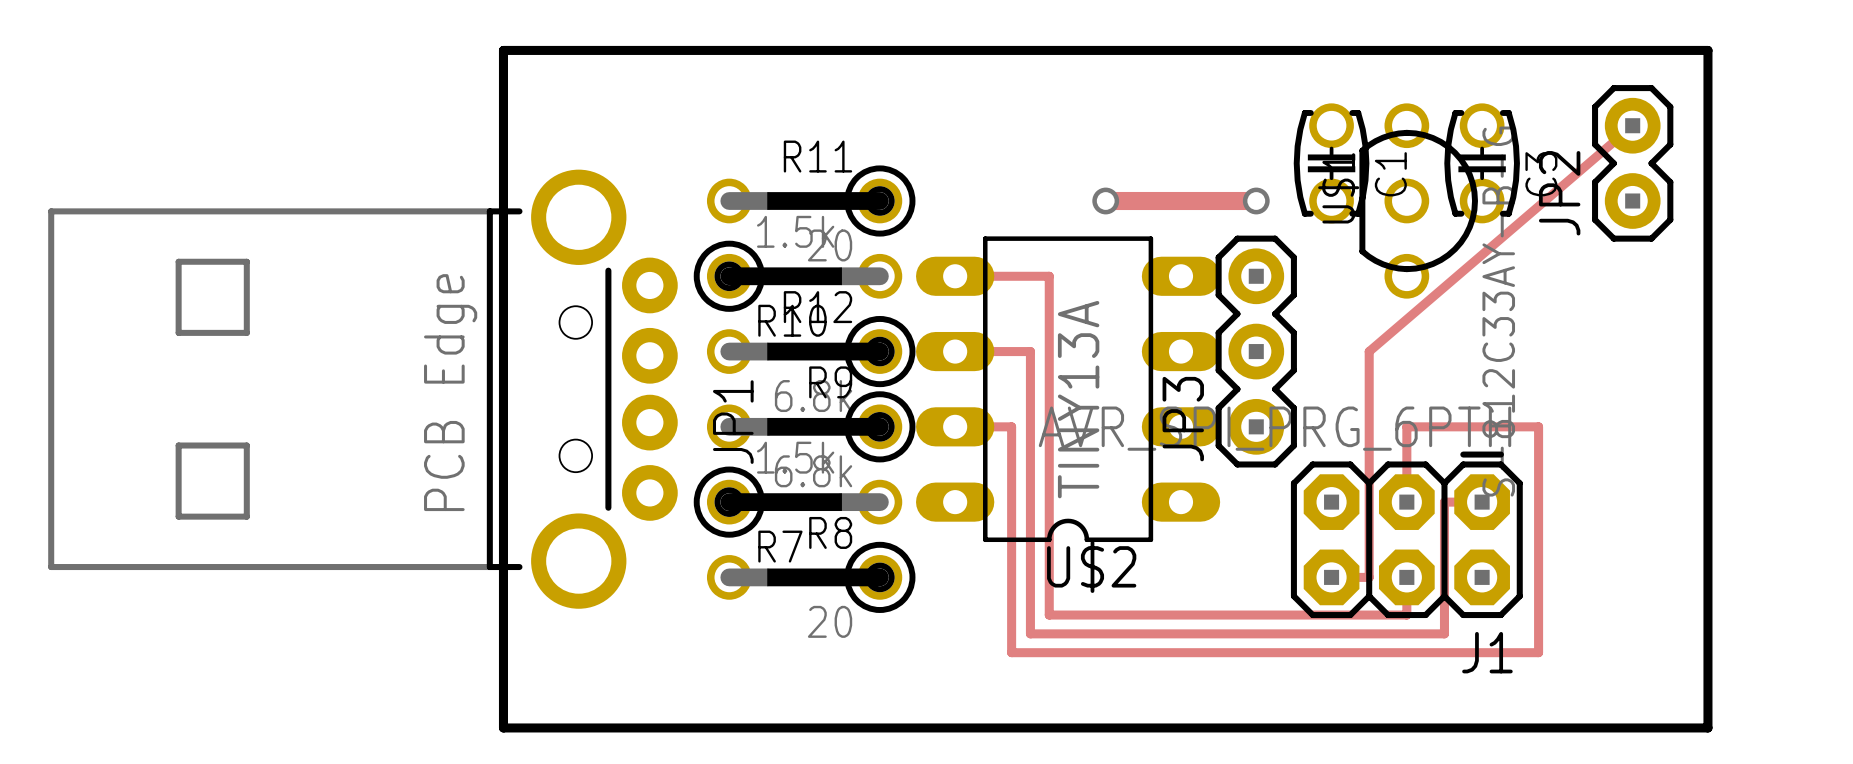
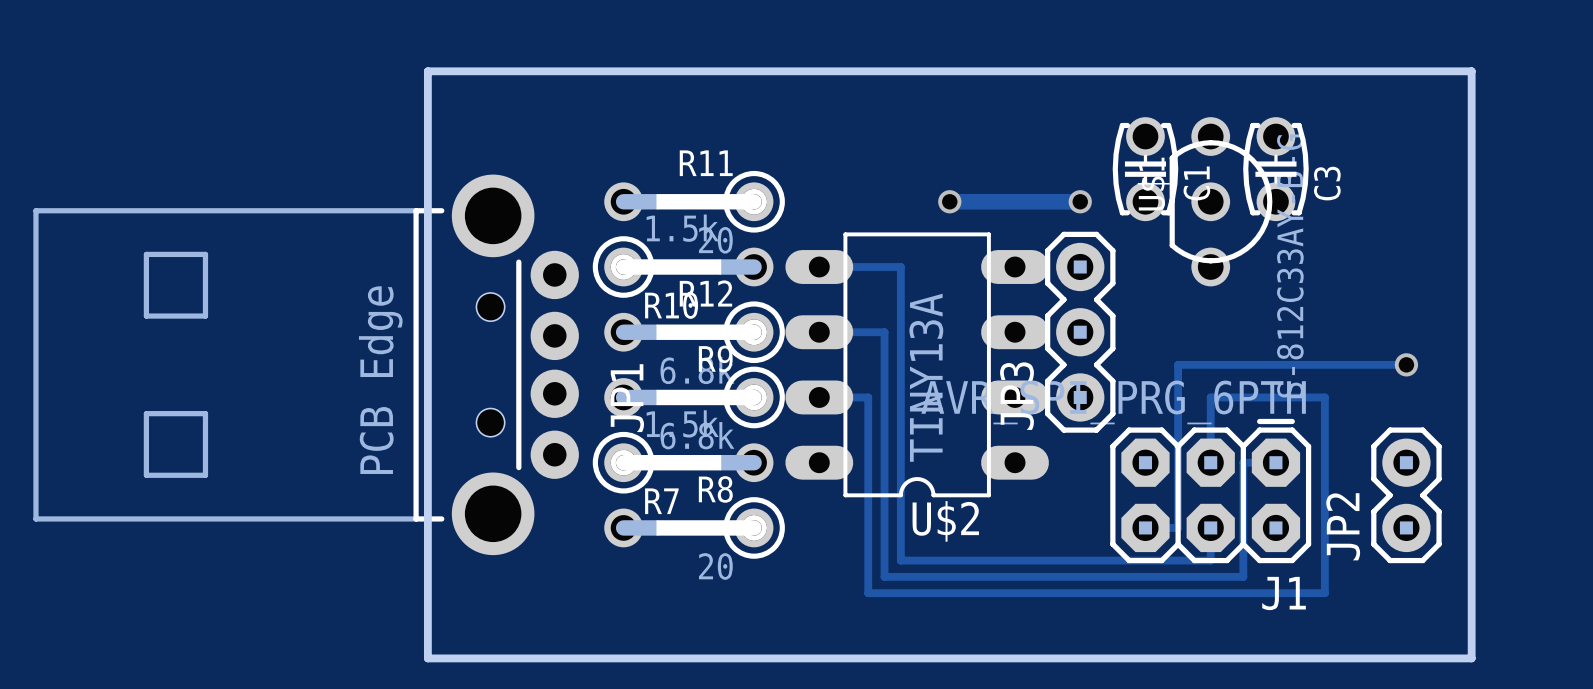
track: (1632, 125) (1369, 351) (1369, 389) -> (1406, 364) (1178, 364)
JP2 position: (1632, 163) -> (1406, 495)
via: none -> (1406, 364)

